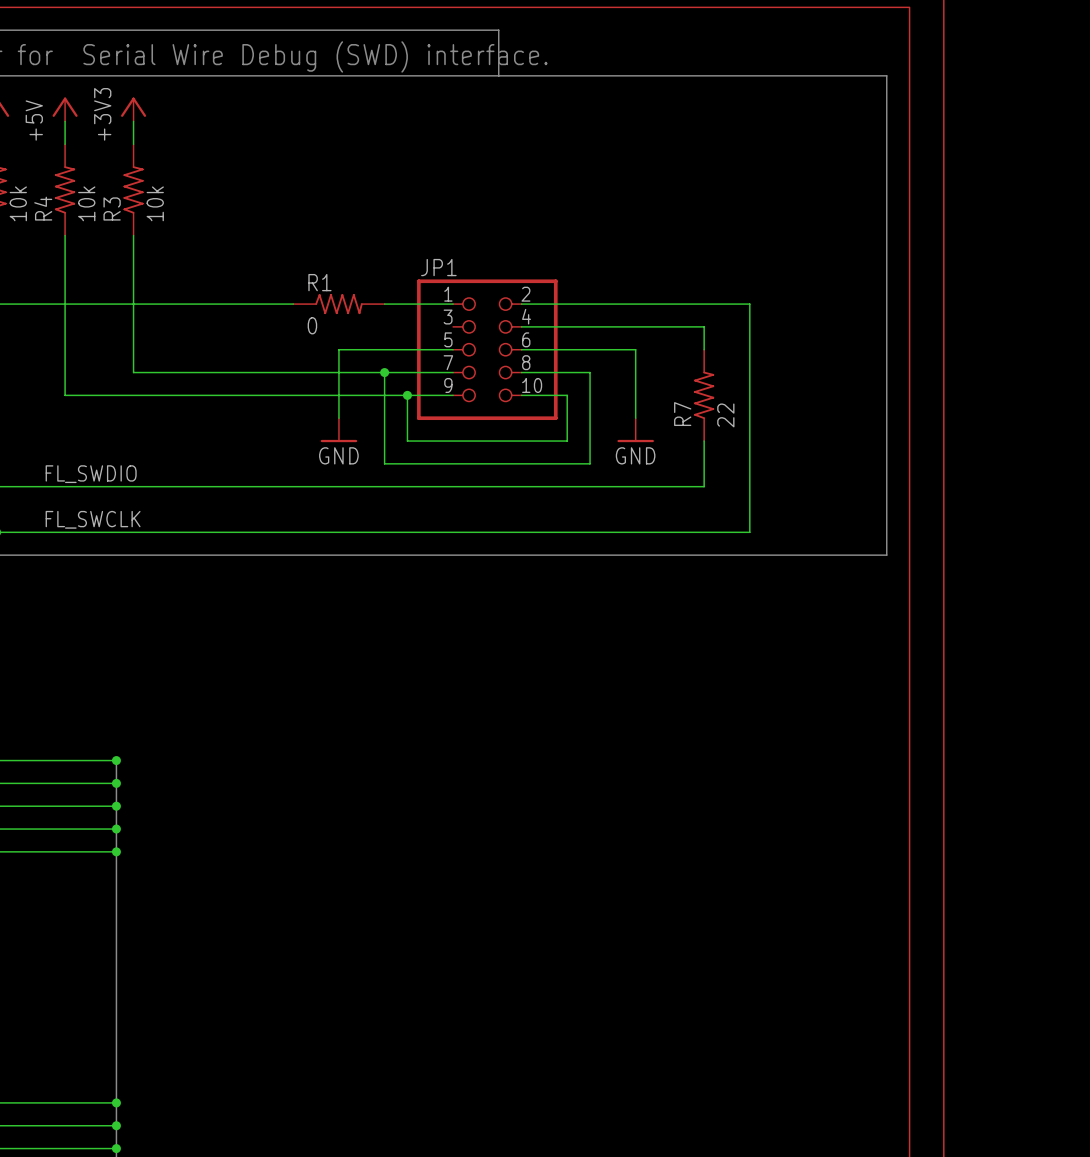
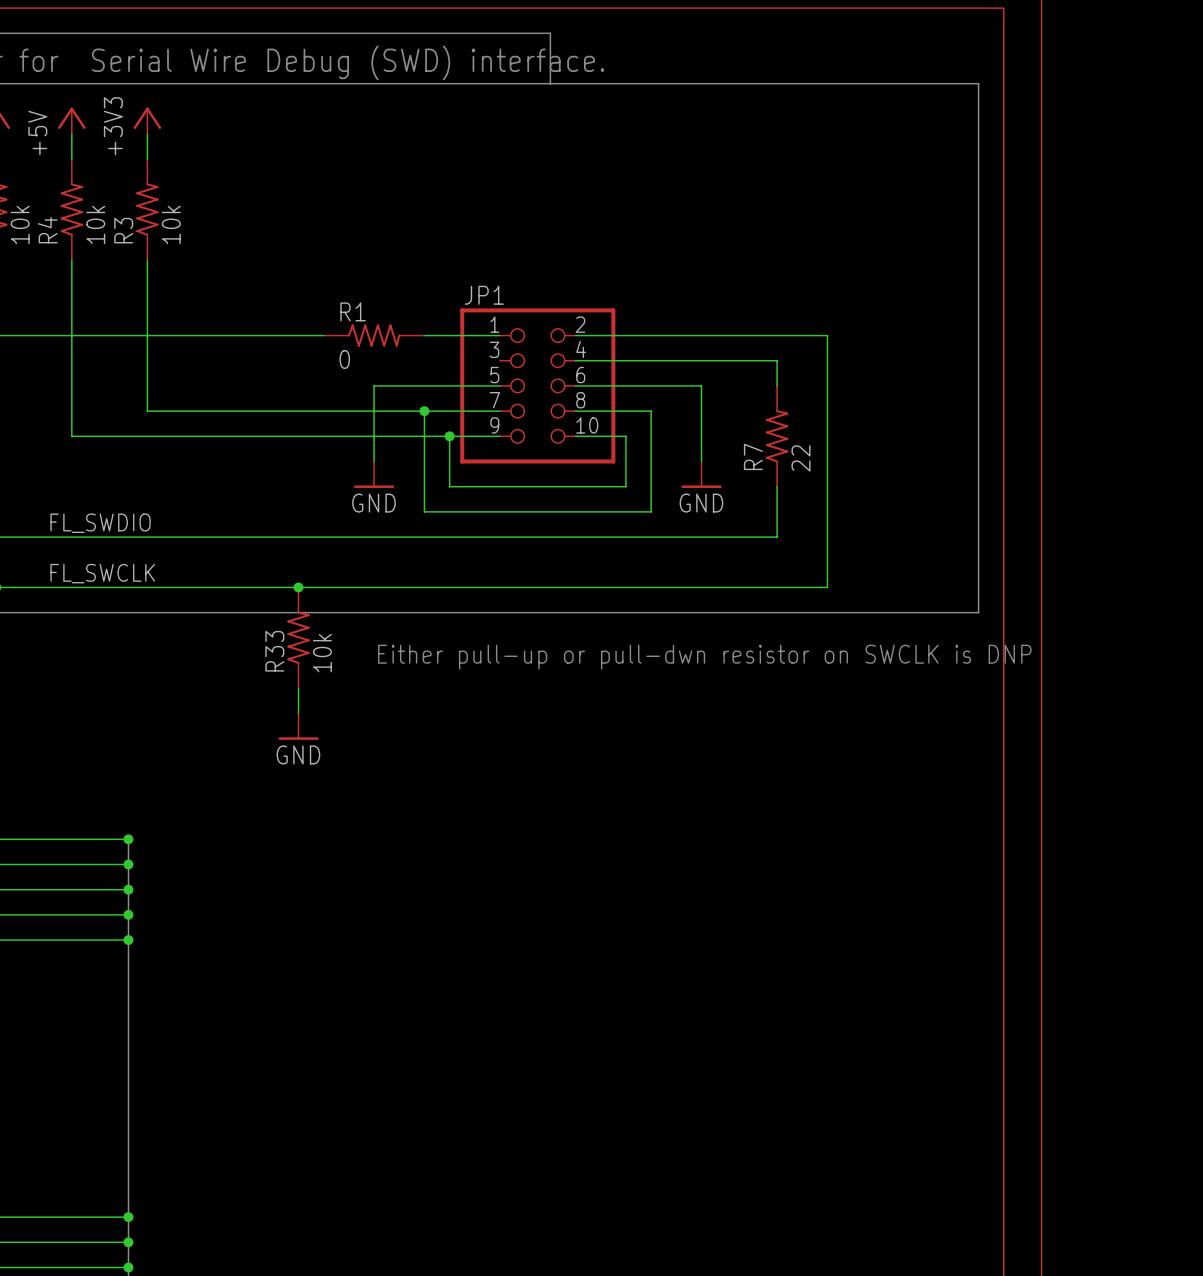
junction: none -> (298, 587)
R33: none -> 10k (298, 637)
text: none -> Either pull-up or pull-dwn resistor on SWCLK is DNP (704, 657)
wire: none -> (298, 688) (298, 713)
power symbol: none -> GND (298, 726)

